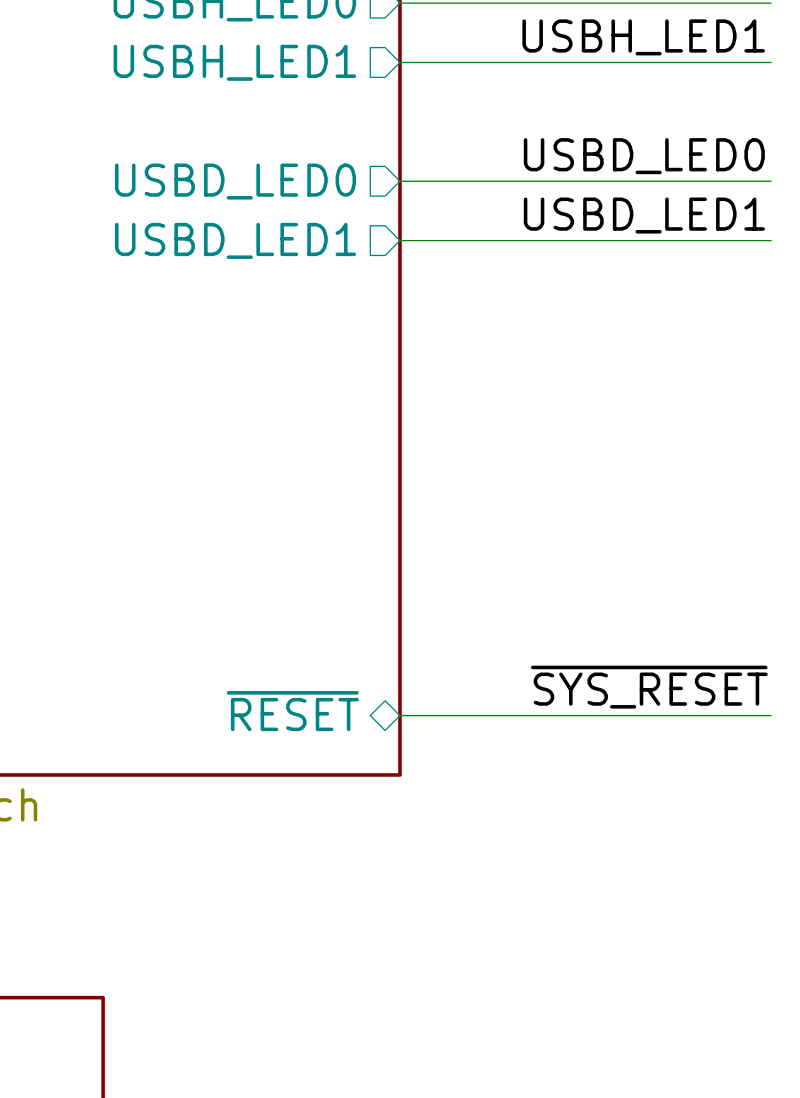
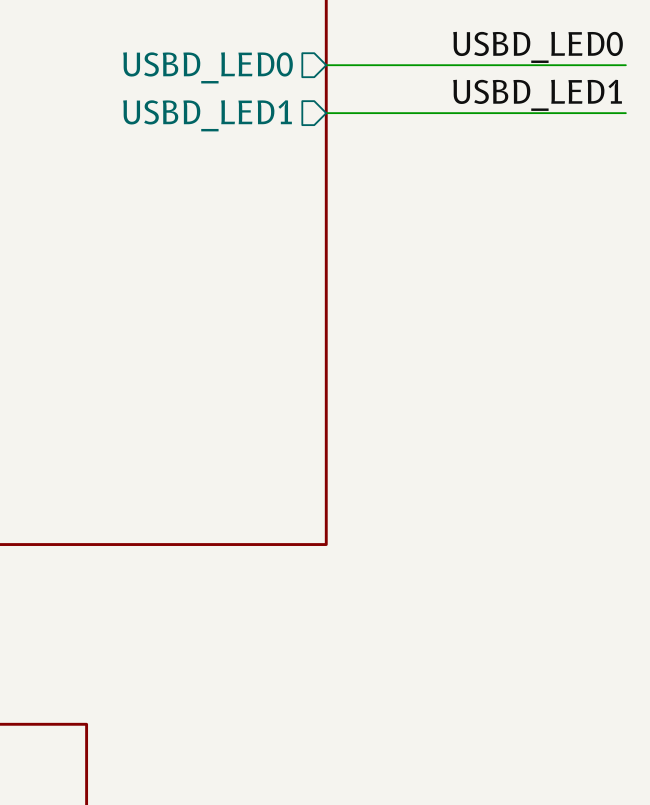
label: ~{SYS_RESET} (649, 687) -> none
sheet pin: ~{RESET} (292, 711) -> none
wire: (399, 715) (771, 715) -> none

